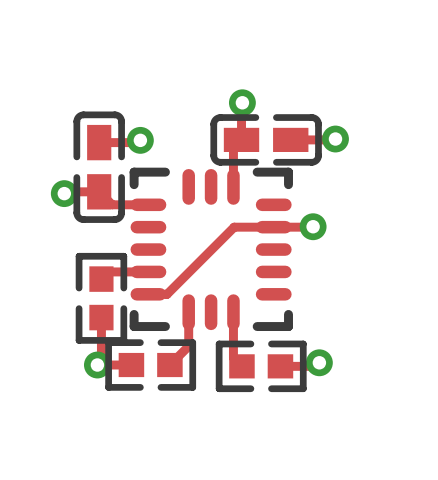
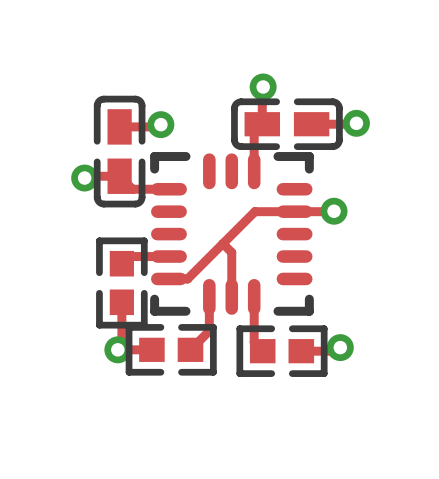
track: none -> (222, 243) (231, 252) (231, 296)

